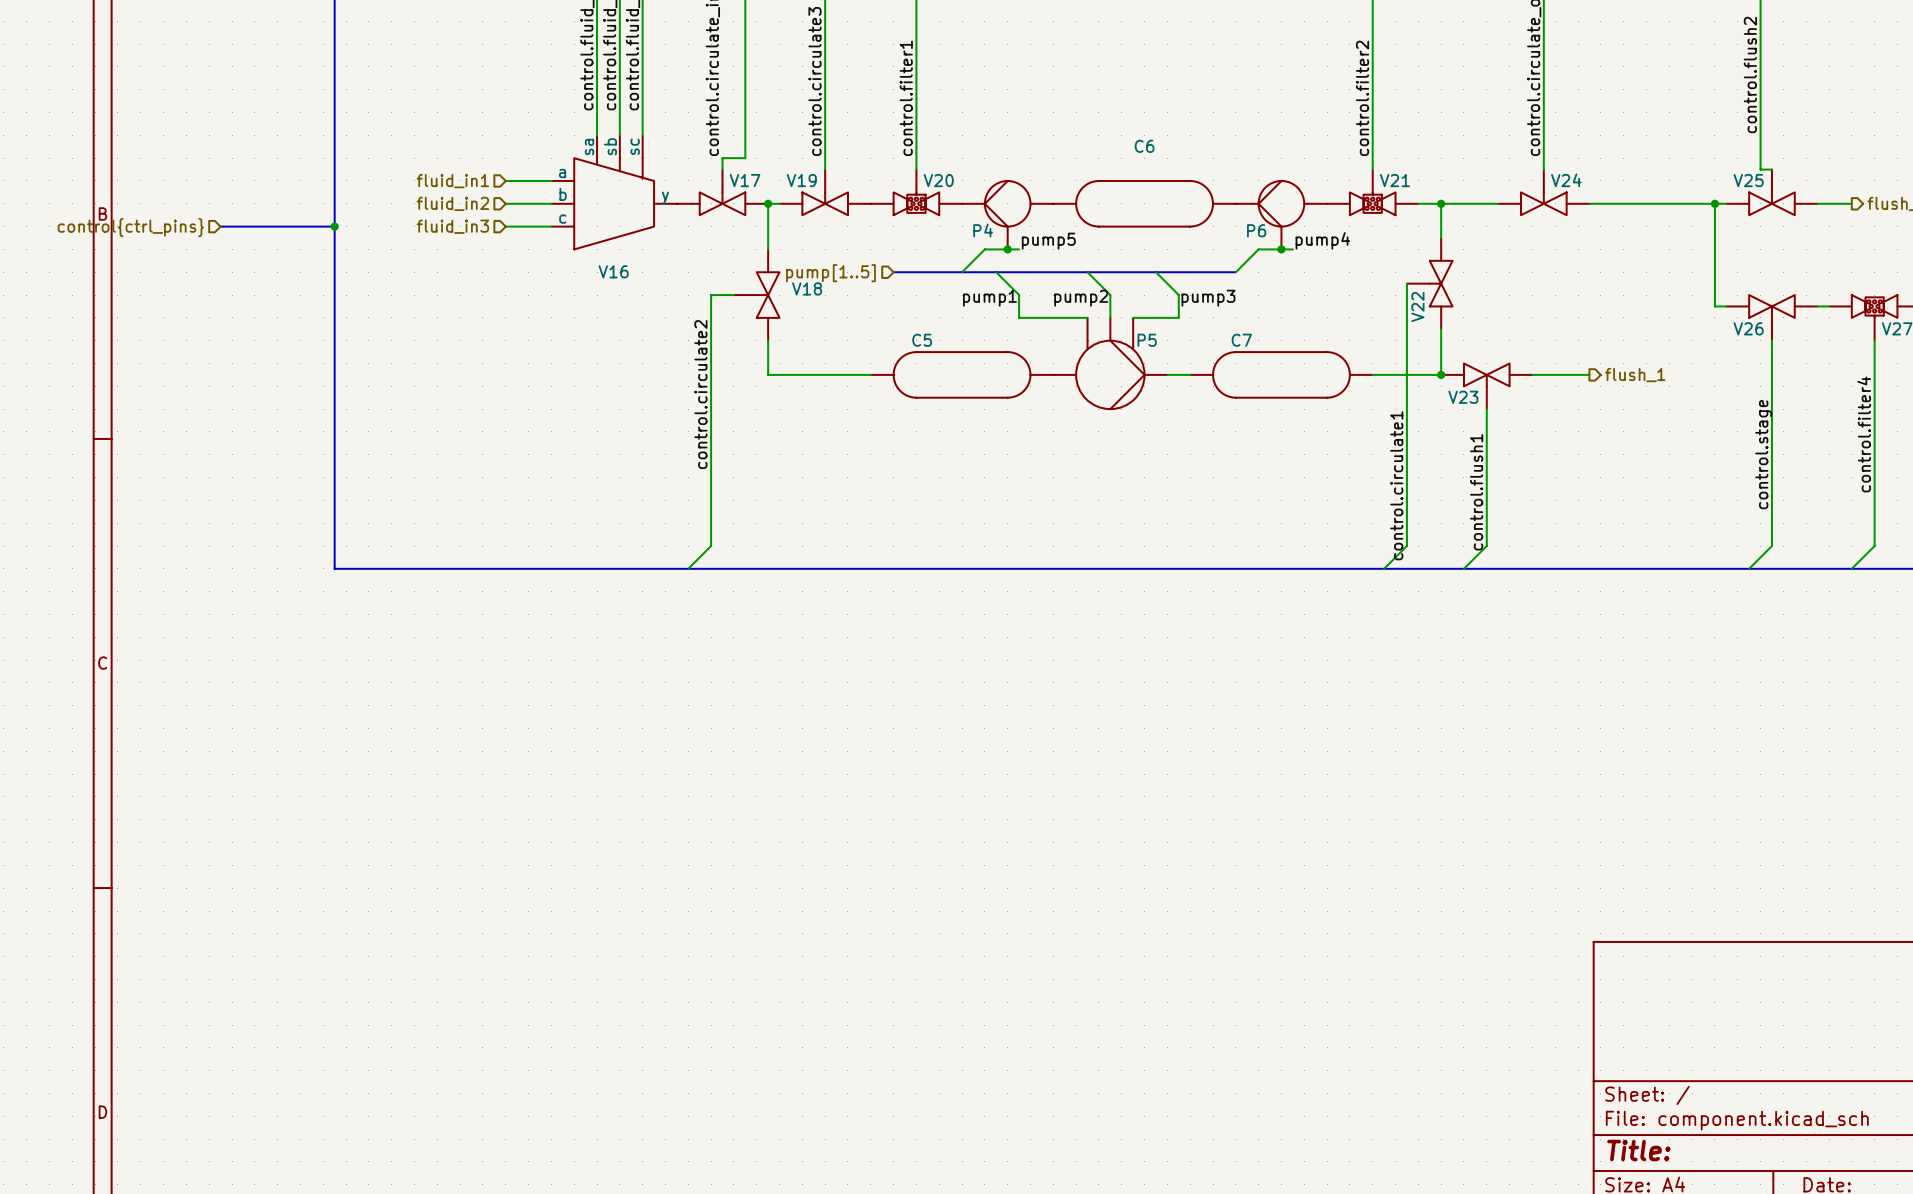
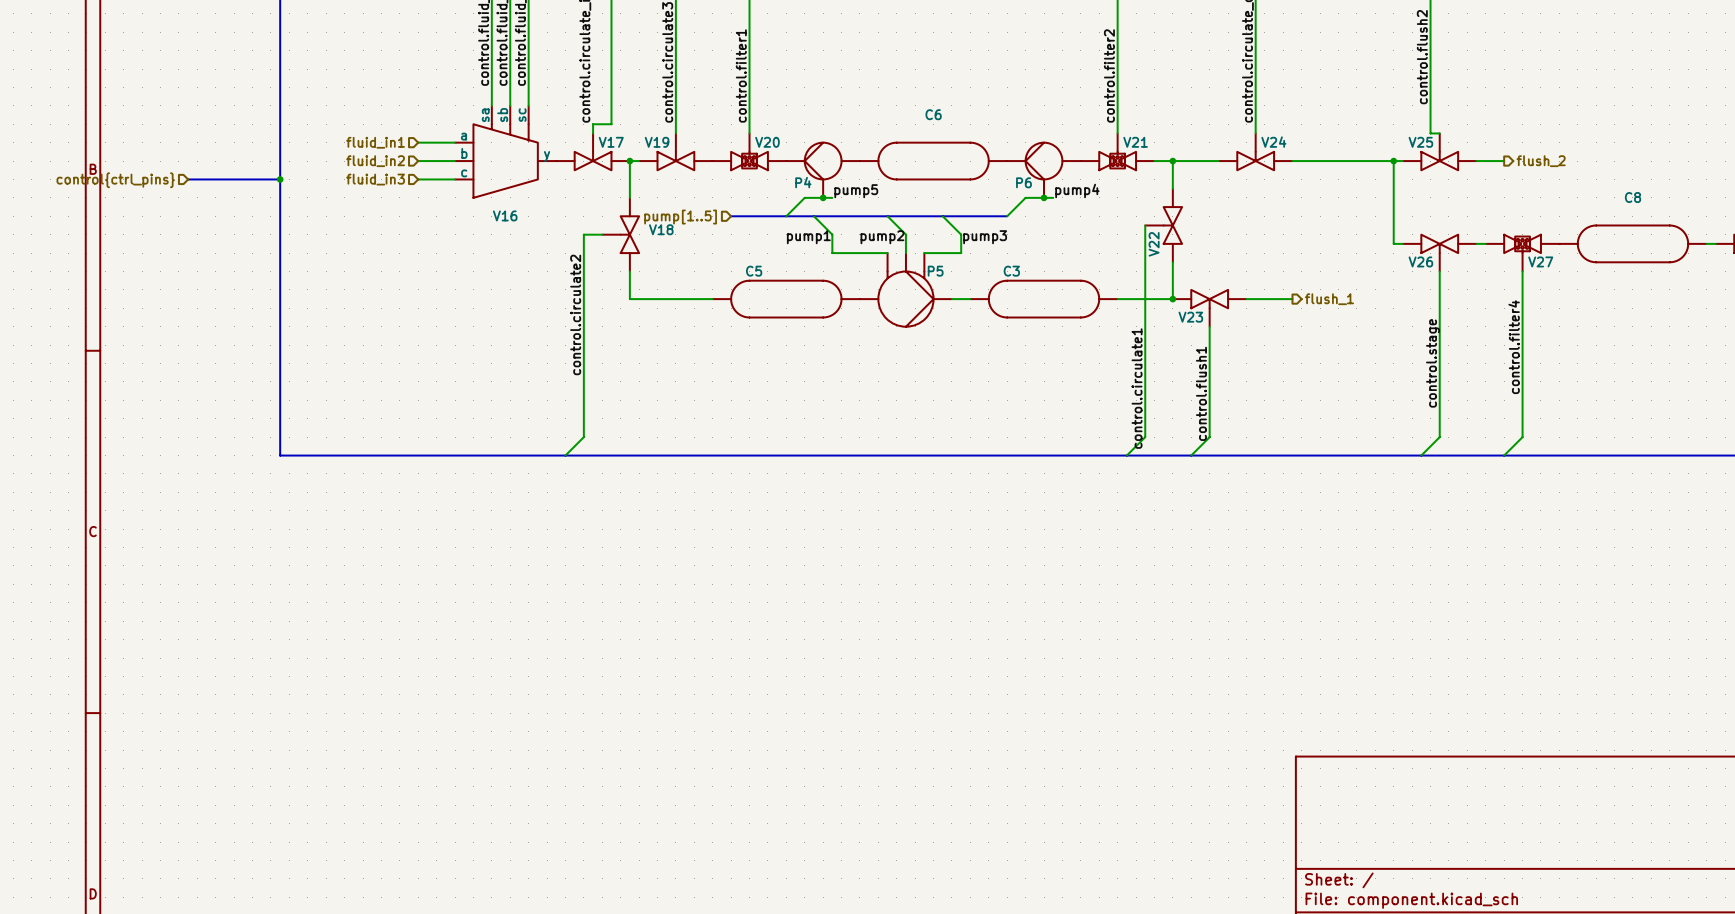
C7 name: C7 (1241, 340) -> C3 (1011, 271)

